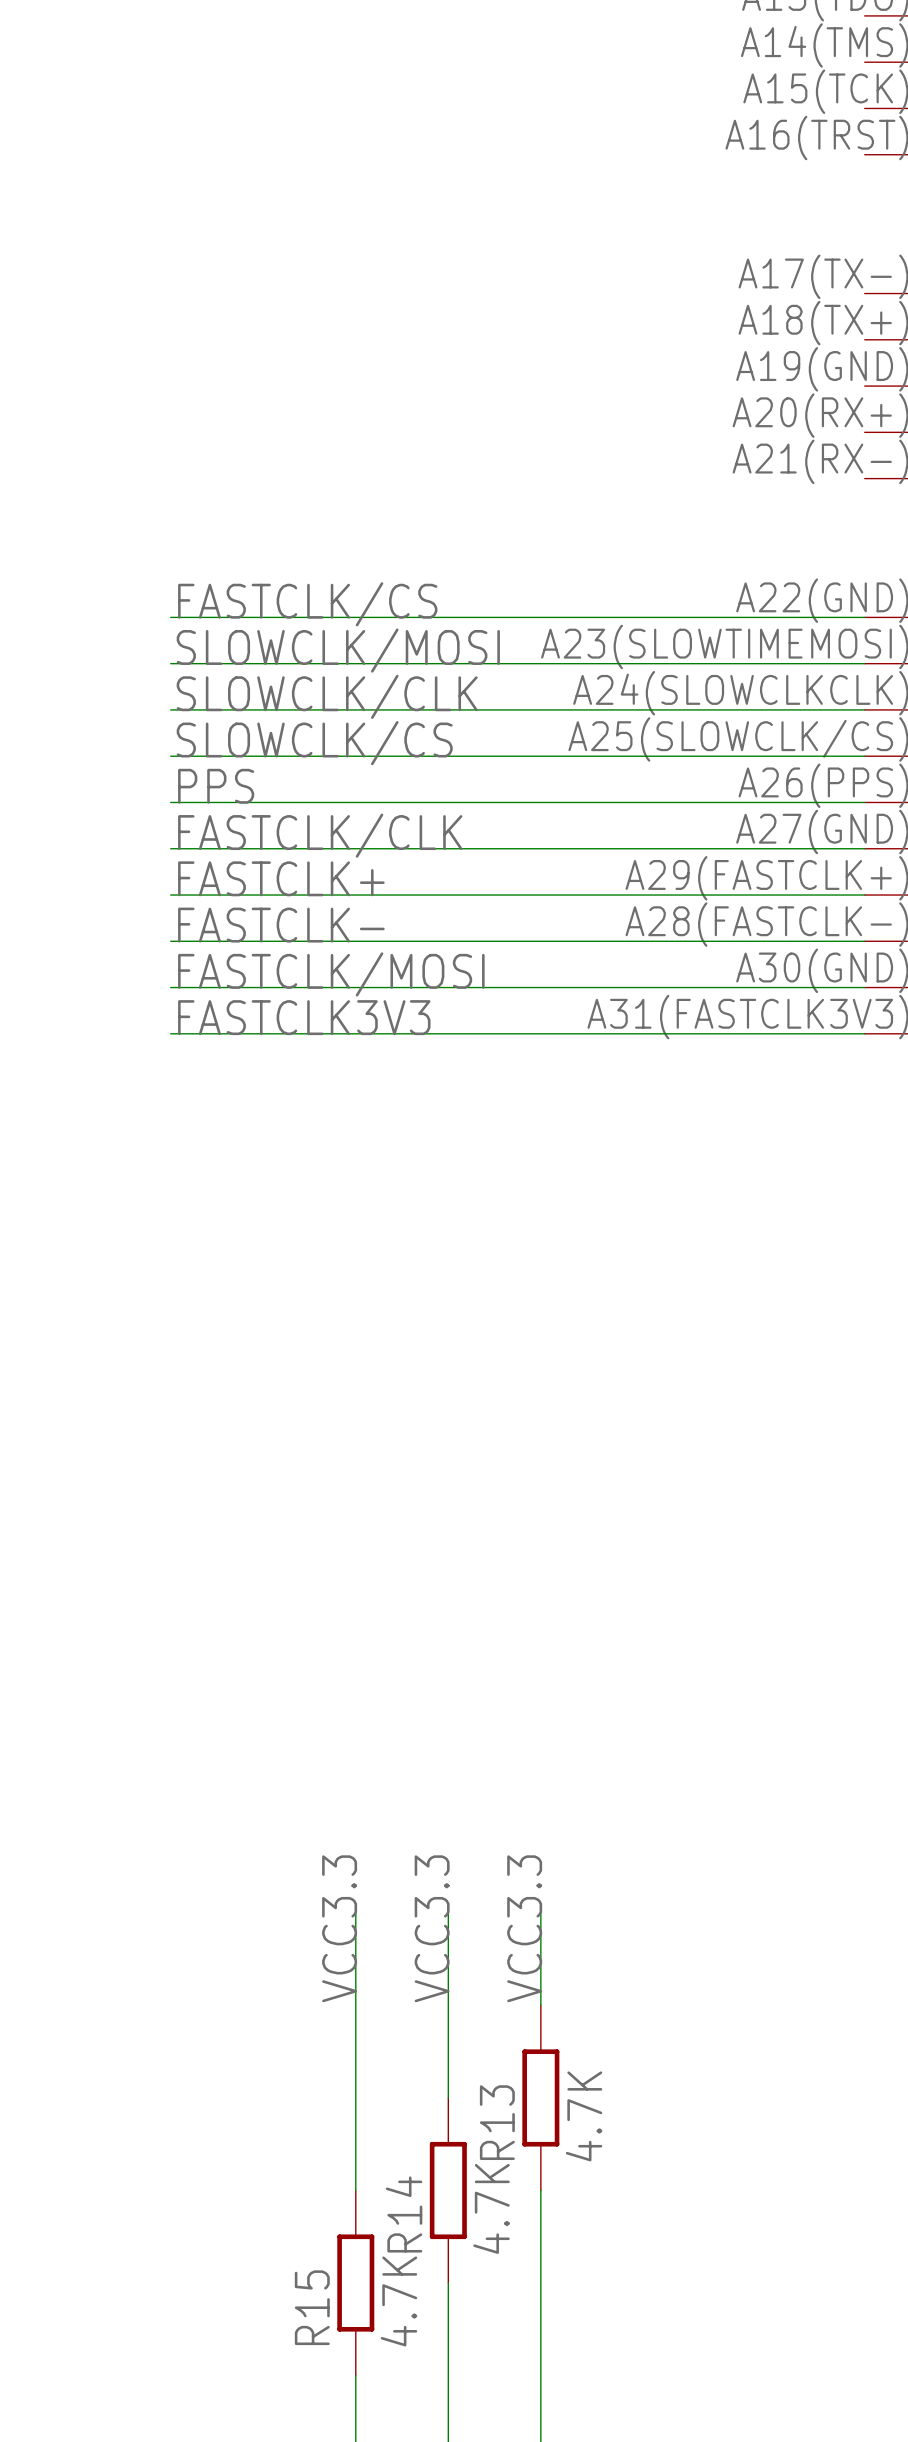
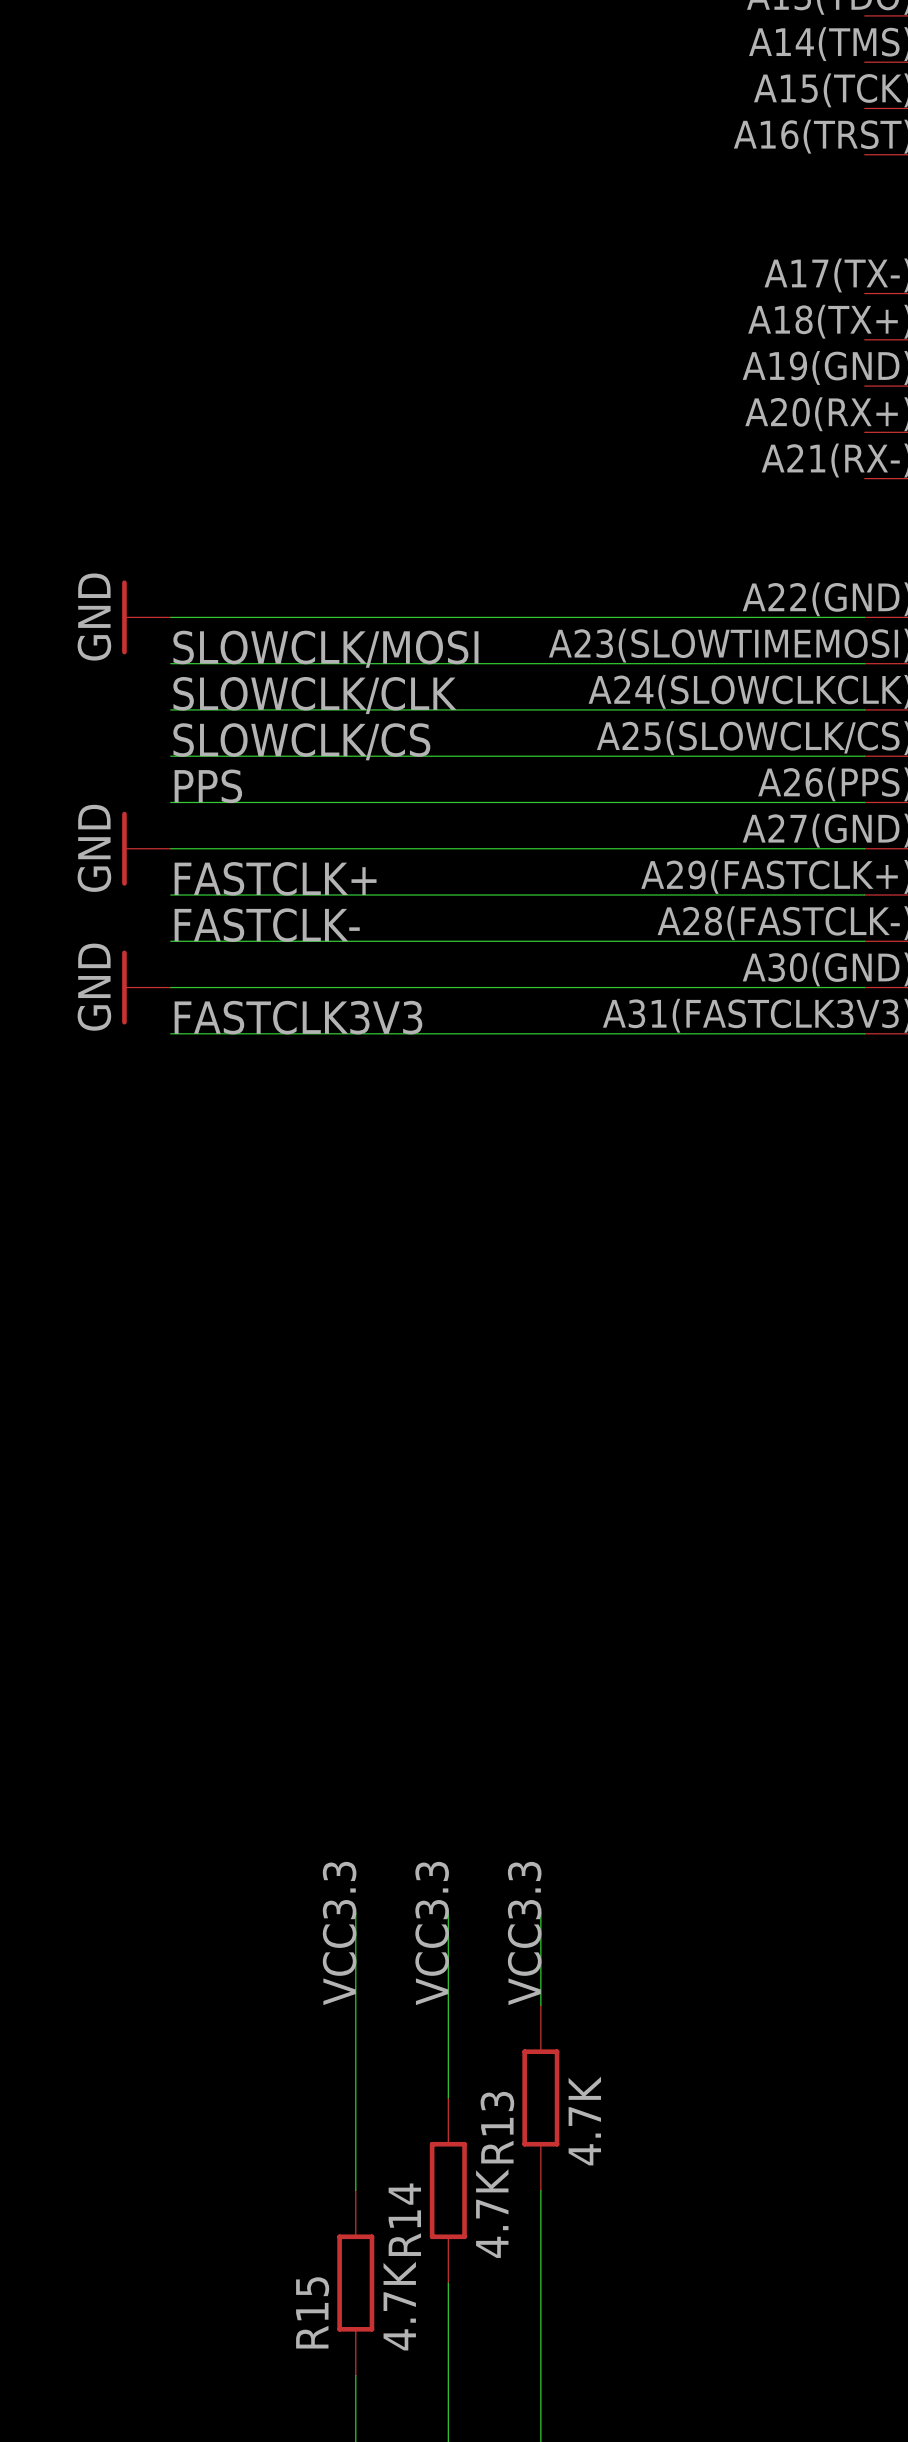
label: FASTCLK/CS (307, 604) -> none
power symbol: none -> GND (146, 617)
label: FASTCLK/CLK (320, 835) -> none
power symbol: none -> GND (146, 848)
label: FASTCLK/MOSI (331, 974) -> none
power symbol: none -> GND (146, 987)

